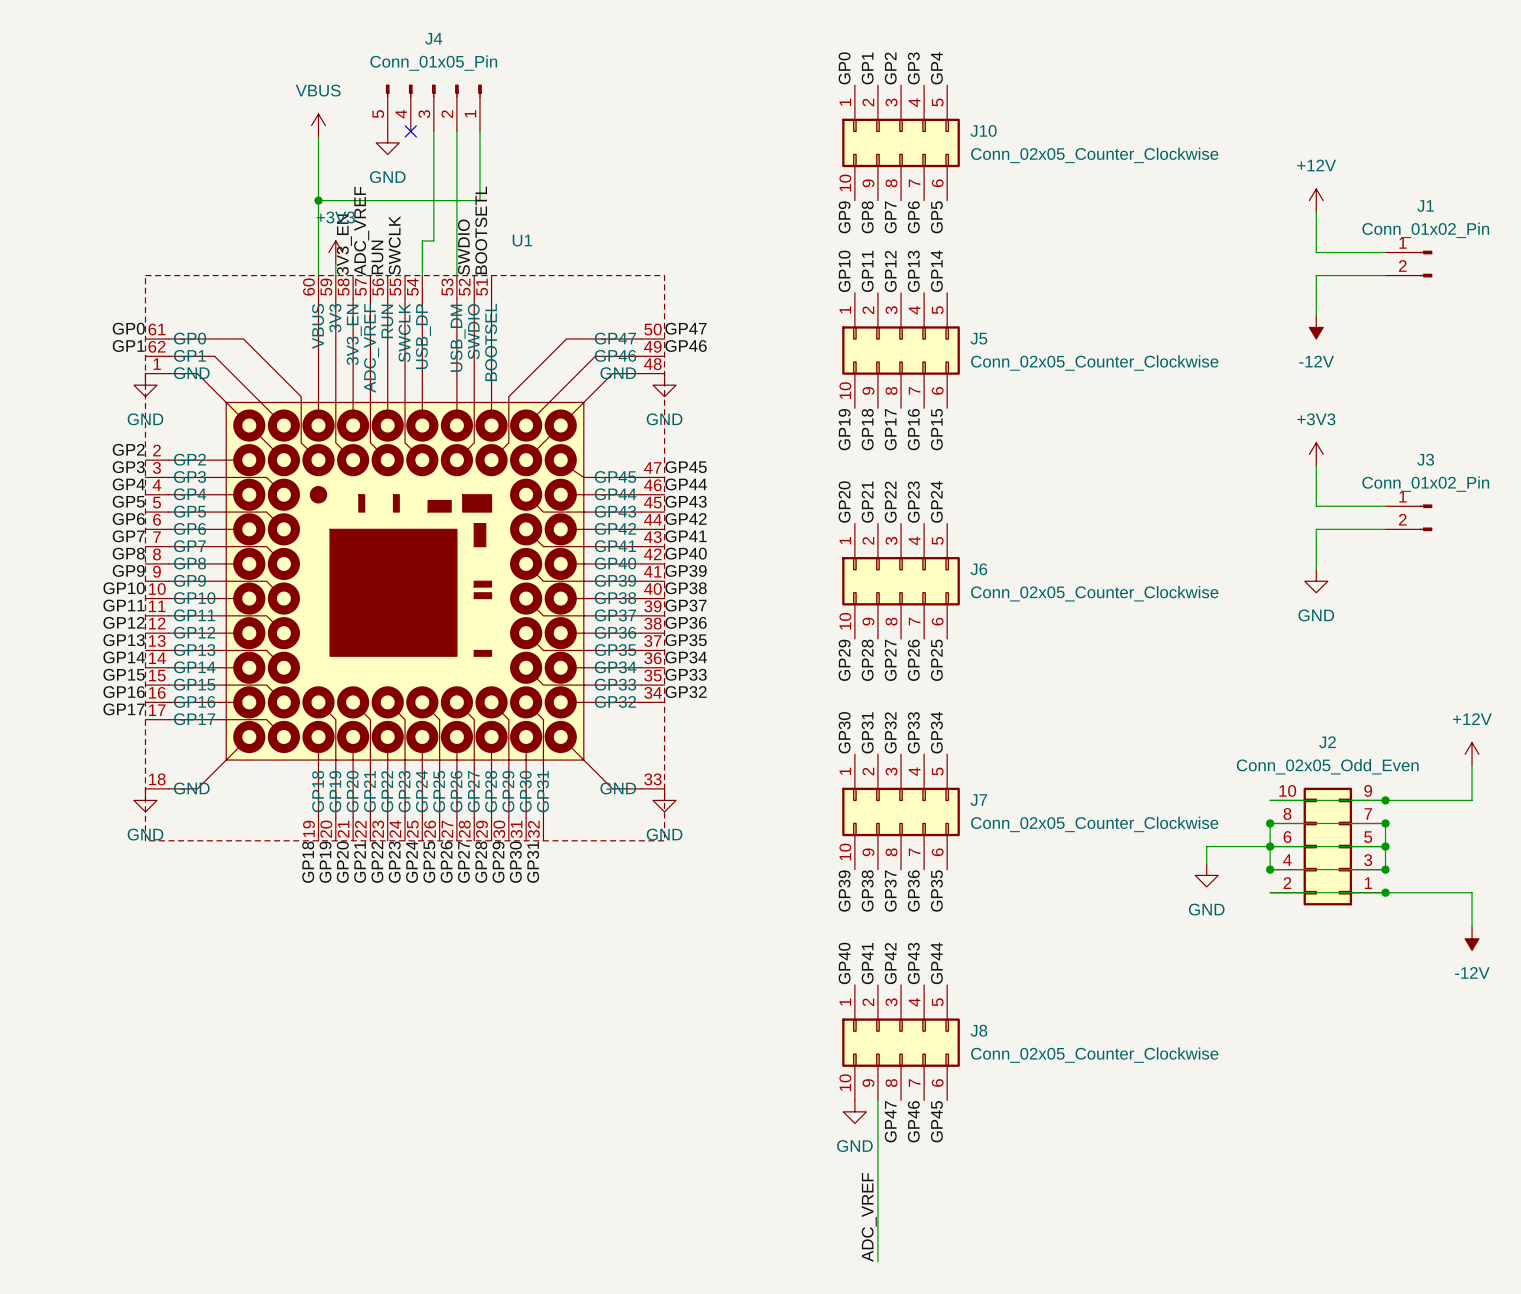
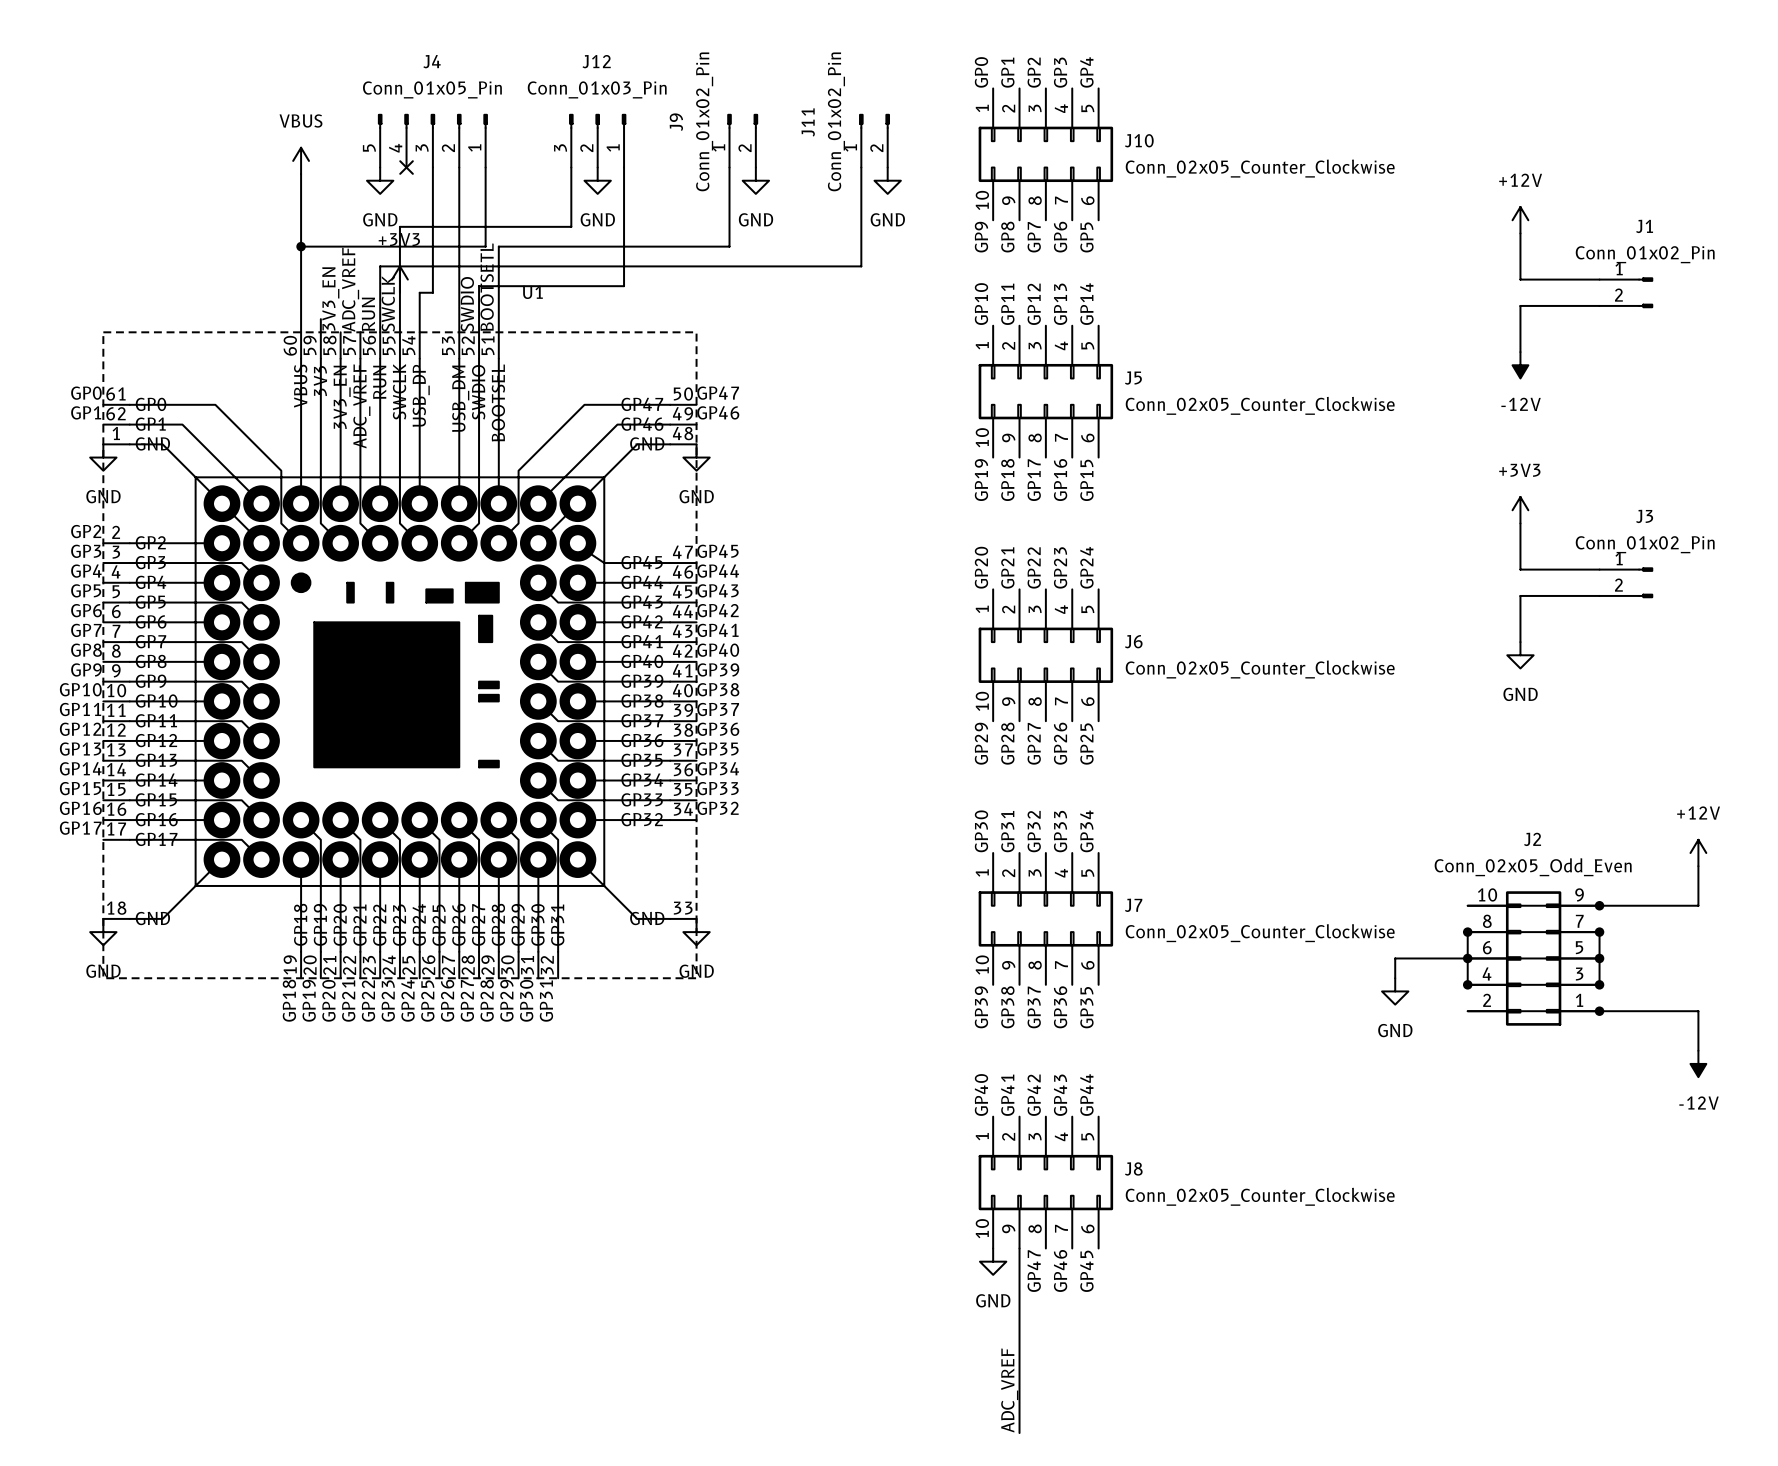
J4 position: (433, 107) -> (432, 140)
power symbol position: VBUS (318, 125) -> VBUS (301, 160)
no-connect mark: (410, 131) -> none
wire: (433, 131) (433, 240) -> (861, 167) (861, 266) (512, 266)
wire: (456, 131) (456, 275) -> (459, 167) (459, 332)
wire: (479, 131) (479, 200) (318, 200) -> (485, 167) (485, 246) (301, 246)
J12: none -> Conn_01x03_Pin (597, 140)
J9: none -> Conn_01x02_Pin (742, 140)
J11: none -> Conn_01x02_Pin (874, 140)
wire: (318, 137) (318, 240) -> (729, 167) (729, 246) (498, 246) (498, 266) (380, 266)
power symbol: GND (387, 142) -> none
no-connect mark: none -> (406, 167)
wire: none -> (432, 167) (432, 292) (419, 292) (419, 332)
wire: none -> (571, 167) (571, 226) (399, 226) (399, 292)
wire: none -> (624, 167) (624, 286) (479, 286) (479, 332)
wire: none -> (301, 174) (301, 332)
power symbol: none -> GND (380, 180)
power symbol: none -> GND (597, 180)
power symbol: none -> GND (755, 180)
power symbol: none -> GND (887, 180)
junction: (318, 200) -> none
junction: none -> (301, 246)
label position: BOOTSETL (481, 230) -> BOOTSETL (487, 287)
label position: ADC_VREF (361, 231) -> ADC_VREF (350, 289)
label position: 3V3_EN (344, 244) -> 3V3_EN (330, 298)
label position: SWCLK (394, 245) -> SWCLK (388, 303)
label position: SWDIO (463, 247) -> SWDIO (467, 304)
label position: RUN (377, 257) -> RUN (368, 314)
wire: none -> (320, 319) (320, 332)
label position: GP0 (128, 328) -> GP0 (86, 393)
label position: GP47 (685, 328) -> GP47 (718, 393)
label position: GP1 (128, 346) -> GP1 (86, 412)
label position: GP46 (686, 346) -> GP46 (718, 412)
power symbol position: GND (145, 385) -> GND (103, 457)
power symbol position: GND (664, 385) -> GND (696, 457)
label position: GP2 (128, 449) -> GP2 (86, 531)
label position: GP3 (128, 467) -> GP3 (86, 551)
label position: GP45 (686, 467) -> GP45 (717, 551)
label position: GP4 (128, 484) -> GP4 (86, 571)
label position: GP44 (686, 484) -> GP44 (718, 571)
label position: GP5 (128, 501) -> GP5 (86, 590)
label position: GP43 (686, 501) -> GP43 (718, 590)
label position: GP6 (128, 519) -> GP6 (86, 610)
label position: GP42 (685, 519) -> GP42 (717, 610)
label position: GP7 (128, 536) -> GP7 (86, 630)
label position: GP41 (686, 536) -> GP41 (717, 630)
label position: GP8 (128, 553) -> GP8 (86, 650)
label position: GP40 (686, 553) -> GP40 (718, 650)
U1 position: (405, 558) -> (399, 655)
label position: GP9 (128, 570) -> GP9 (86, 669)
label position: GP39 (686, 570) -> GP39 (718, 669)
label position: GP10 (124, 588) -> GP10 (80, 689)
label position: GP38 (686, 588) -> GP38 (718, 689)
label position: GP11 (124, 605) -> GP11 (80, 709)
label position: GP37 (685, 605) -> GP37 (718, 709)
label position: GP12 (124, 622) -> GP12 (80, 729)
label position: GP36 (686, 622) -> GP36 (718, 729)
label position: GP13 (124, 640) -> GP13 (80, 749)
label position: GP35 (686, 640) -> GP35 (717, 749)
label position: GP14 (124, 657) -> GP14 (80, 768)
label position: GP34 (686, 657) -> GP34 (718, 768)
label position: GP15 (124, 674) -> GP15 (80, 788)
label position: GP33 (686, 674) -> GP33 (718, 788)
label position: GP16 (124, 692) -> GP16 (80, 808)
label position: GP32 (685, 692) -> GP32 (717, 808)
label position: GP17 (124, 709) -> GP17 (80, 828)
power symbol position: GND (145, 800) -> GND (103, 932)
power symbol position: GND (664, 800) -> GND (696, 932)
label position: GP18 (308, 862) -> GP18 (289, 1000)
label position: GP19 (325, 862) -> GP19 (309, 1000)
label position: GP20 (342, 862) -> GP20 (328, 1000)
label position: GP21 (360, 862) -> GP21 (348, 1001)
label position: GP22 (377, 862) -> GP22 (368, 1001)
label position: GP23 (394, 862) -> GP23 (388, 1001)
label position: GP24 (412, 862) -> GP24 (408, 1000)
label position: GP25 (429, 862) -> GP25 (427, 1001)
label position: GP26 (446, 862) -> GP26 (447, 1000)
label position: GP27 (463, 862) -> GP27 (467, 1000)
label position: GP28 (481, 862) -> GP28 (487, 1000)
label position: GP29 (498, 862) -> GP29 (506, 1000)
label position: GP30 (515, 862) -> GP30 (526, 1000)
label position: GP31 (533, 862) -> GP31 (546, 1001)

